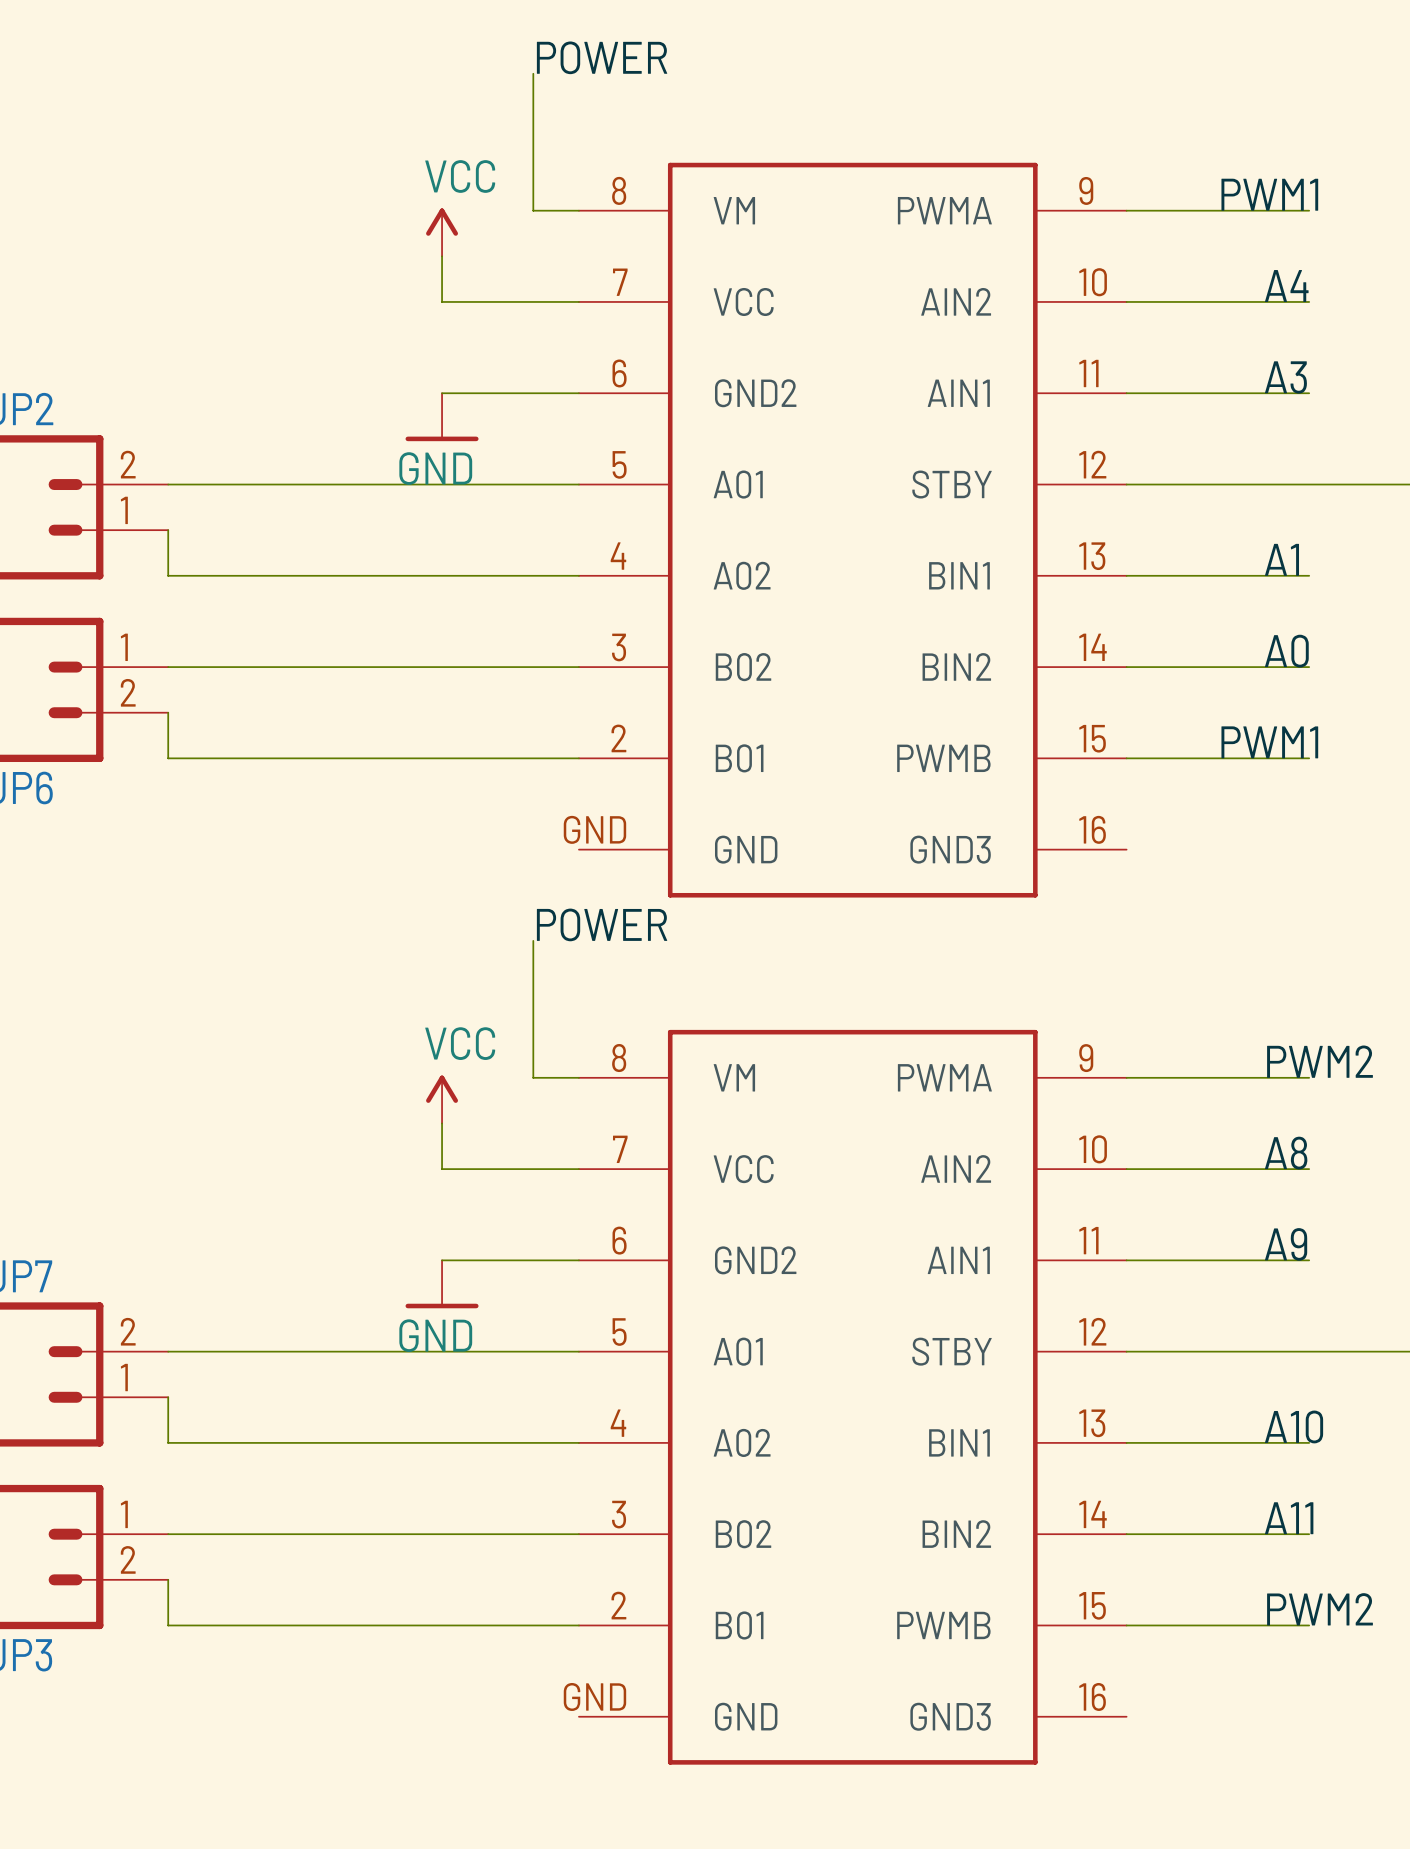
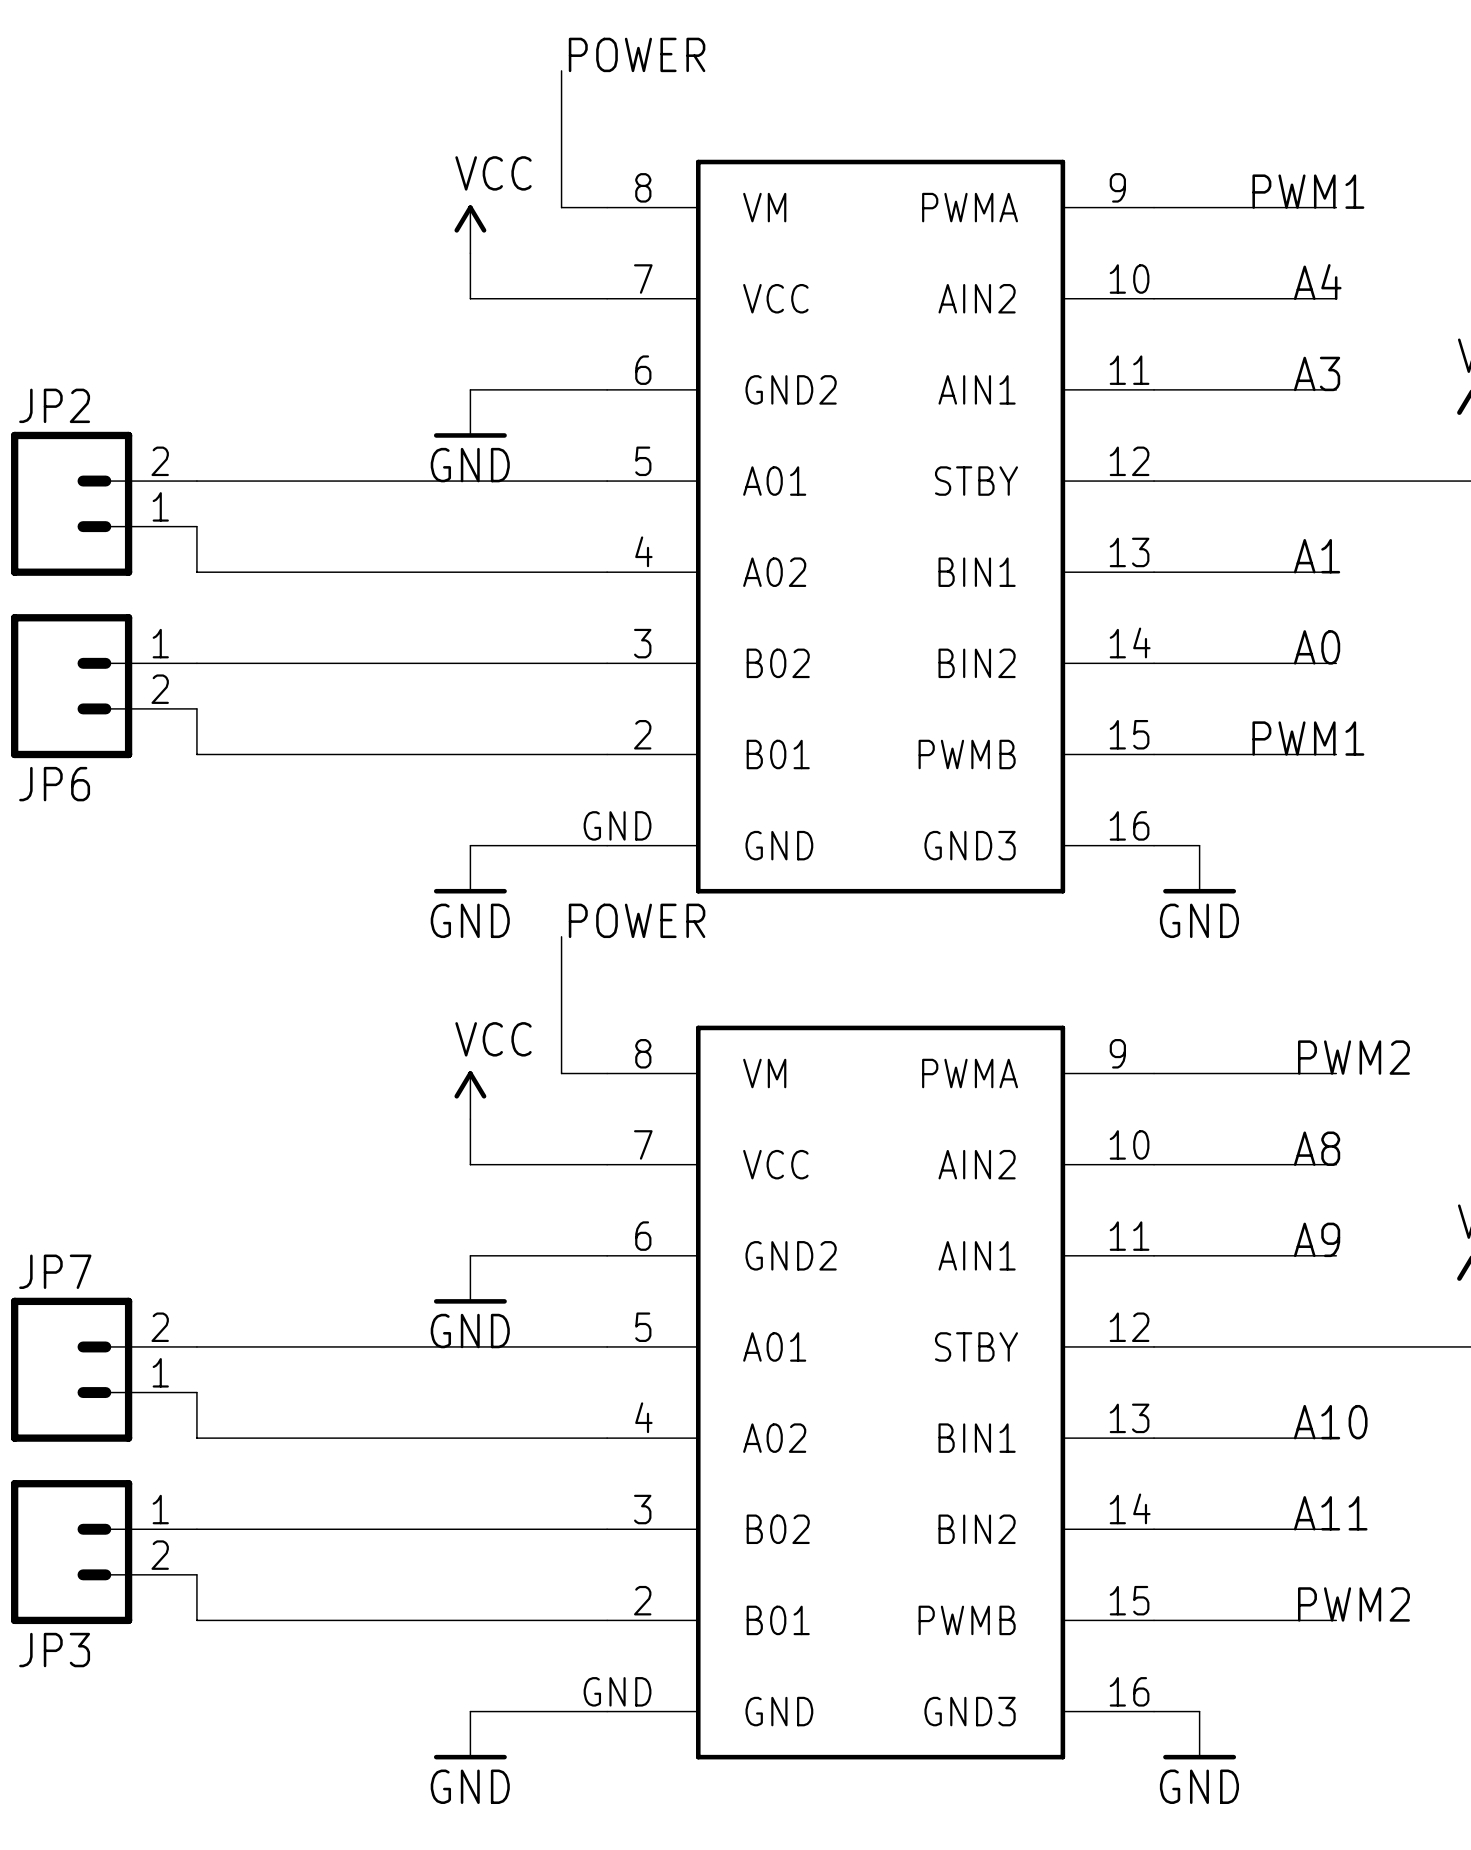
wire: none -> (470, 845) (607, 845)
wire: none -> (1154, 845) (1199, 845)
power symbol: none -> GND (470, 869)
power symbol: none -> GND (1199, 869)
wire: none -> (470, 1711) (607, 1711)
wire: none -> (1154, 1711) (1199, 1711)
power symbol: none -> GND (470, 1735)
power symbol: none -> GND (1199, 1735)

